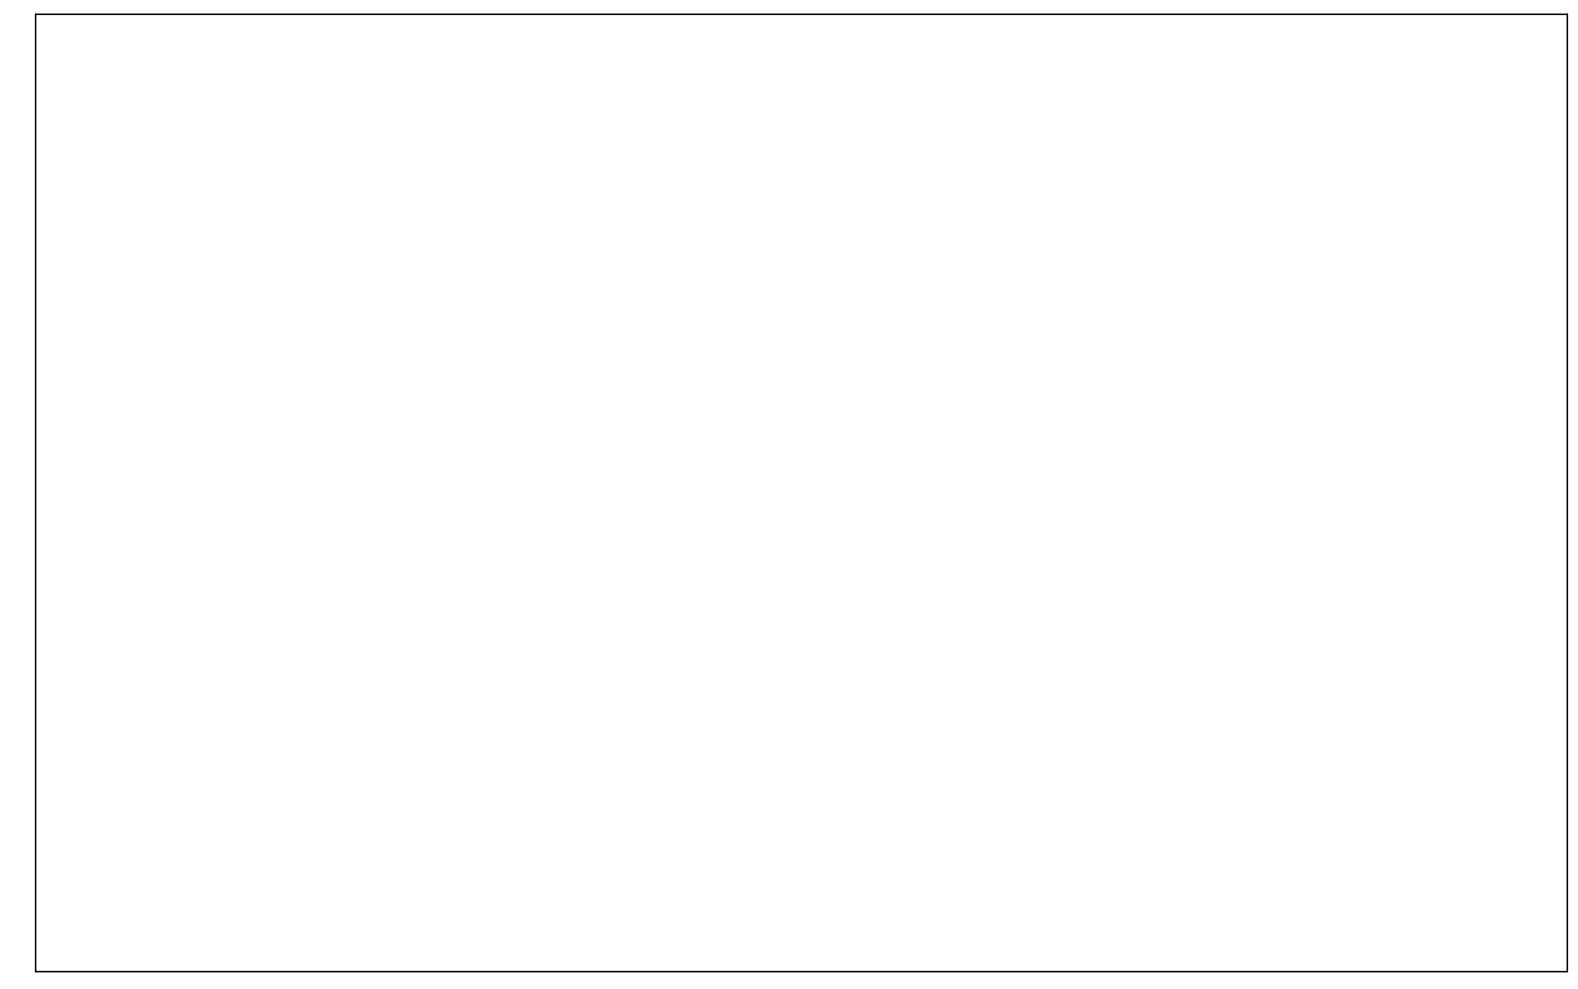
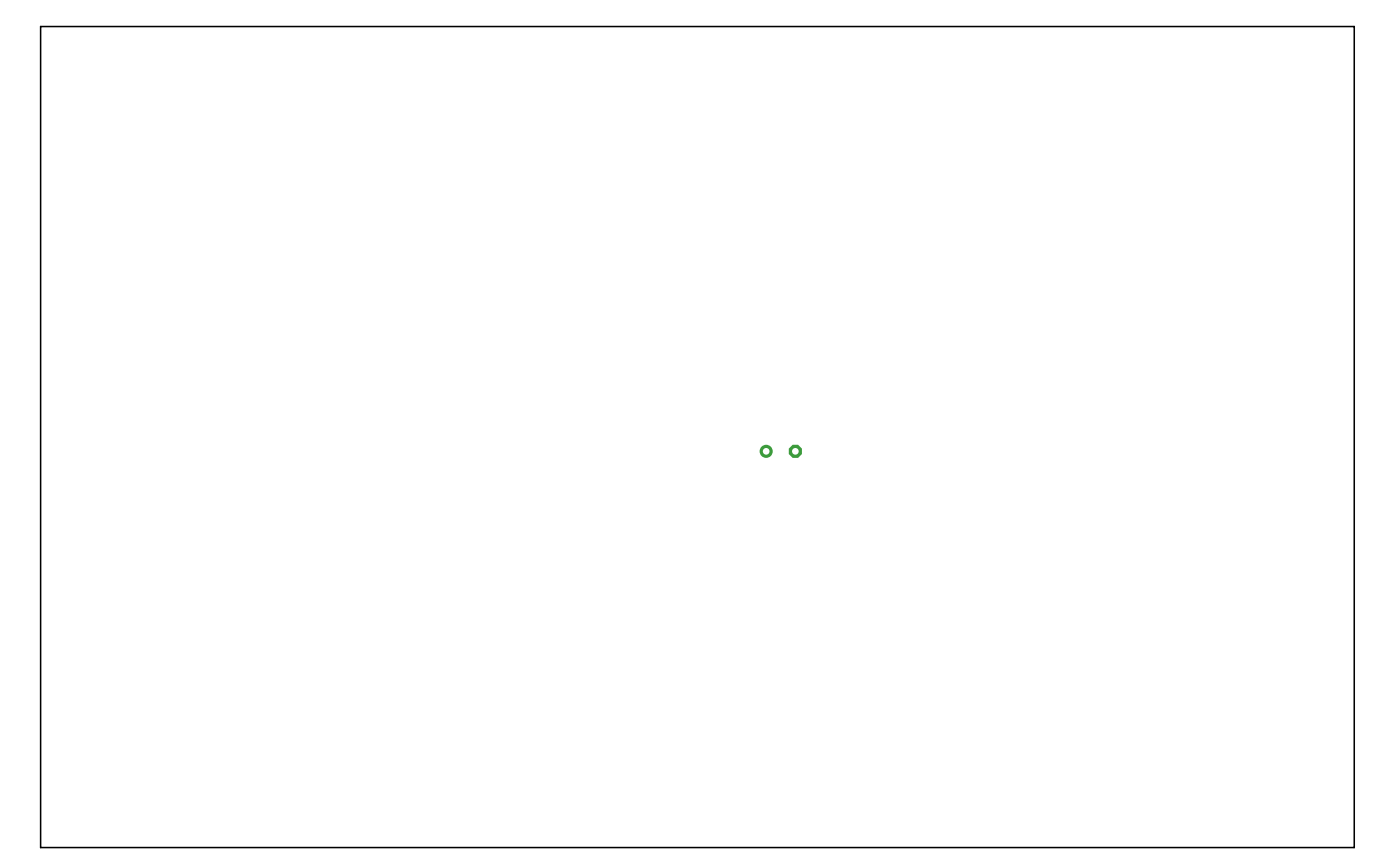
part: none -> (780, 451)

